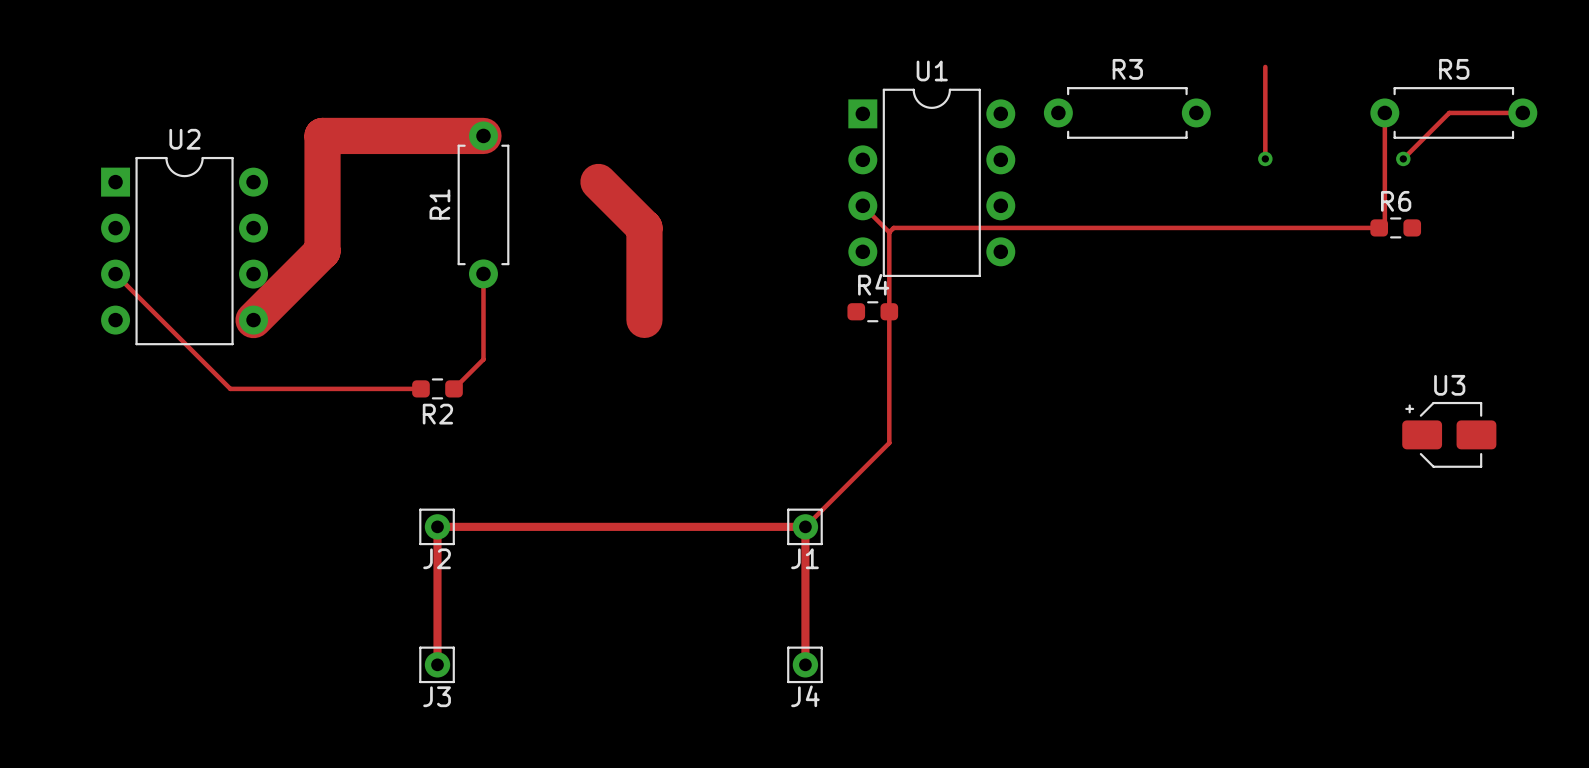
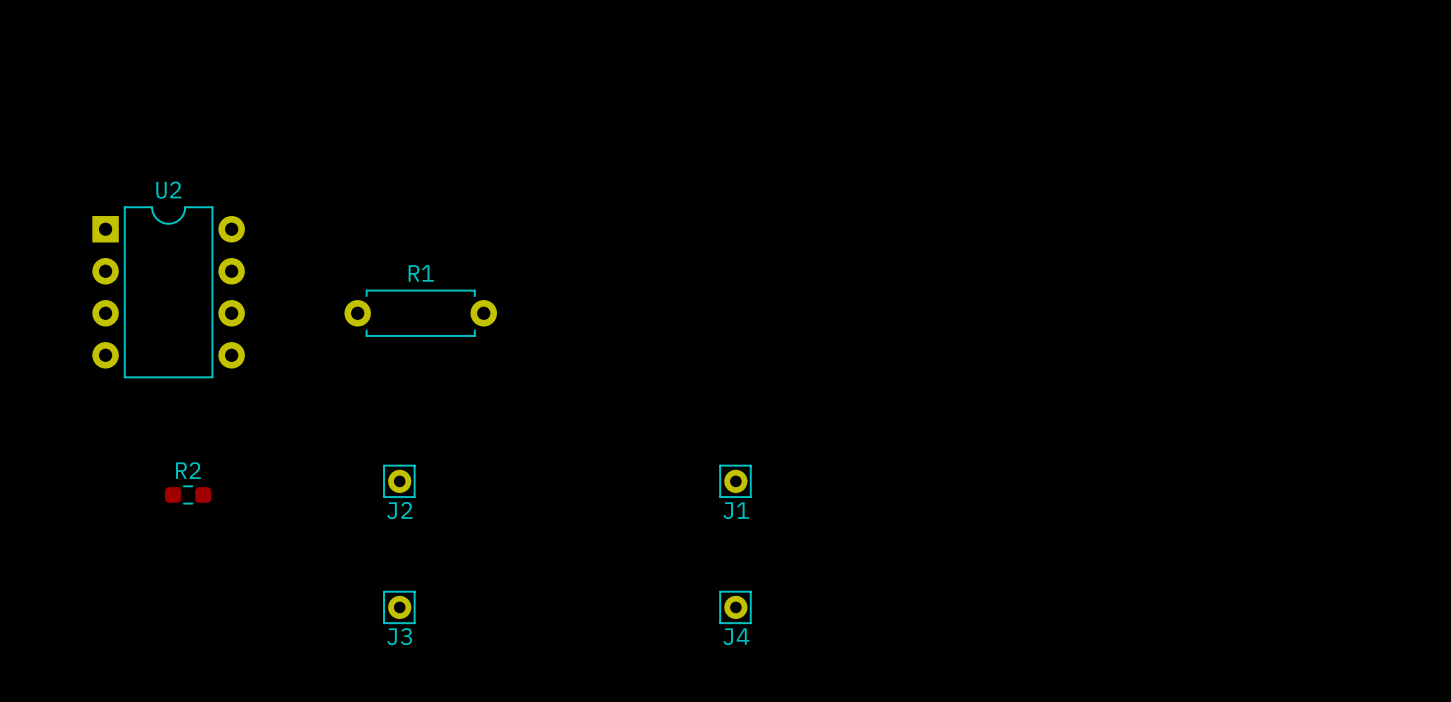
track: (1265, 66) (1265, 158) -> none
R3: (1127, 112) -> none
track: (1384, 112) (1384, 222) (1379, 227) (893, 227) (889, 232) -> none
R5: (1453, 112) -> none
track: (1522, 112) (1449, 112) (1403, 158) -> none
track: (483, 135) (322, 135) (322, 251) (253, 320) -> none
via: (1265, 158) -> none
via: (1403, 158) -> none
track: (598, 181) (644, 227) (644, 319) -> none
U1: (931, 182) -> none
R1 rotation: 0° (483, 204) -> 90° clockwise (420, 313)
R1 position: (483, 204) -> (420, 313)
track: (862, 205) (889, 232) -> none
R6: (1395, 227) -> none
track: (889, 232) (889, 442) (805, 526) -> none
U2 position: (184, 251) -> (168, 292)
track: (483, 273) (483, 359) (454, 388) -> none
track: (115, 274) (230, 388) (420, 388) -> none
R4: (872, 311) -> none
R2 position: (437, 388) -> (188, 494)
R2 name position: R2 (437, 414) -> R2 (188, 470)
U3: (1449, 434) -> none
track: (805, 526) (437, 526) (437, 664) -> none
track: (805, 526) (805, 664) -> none

